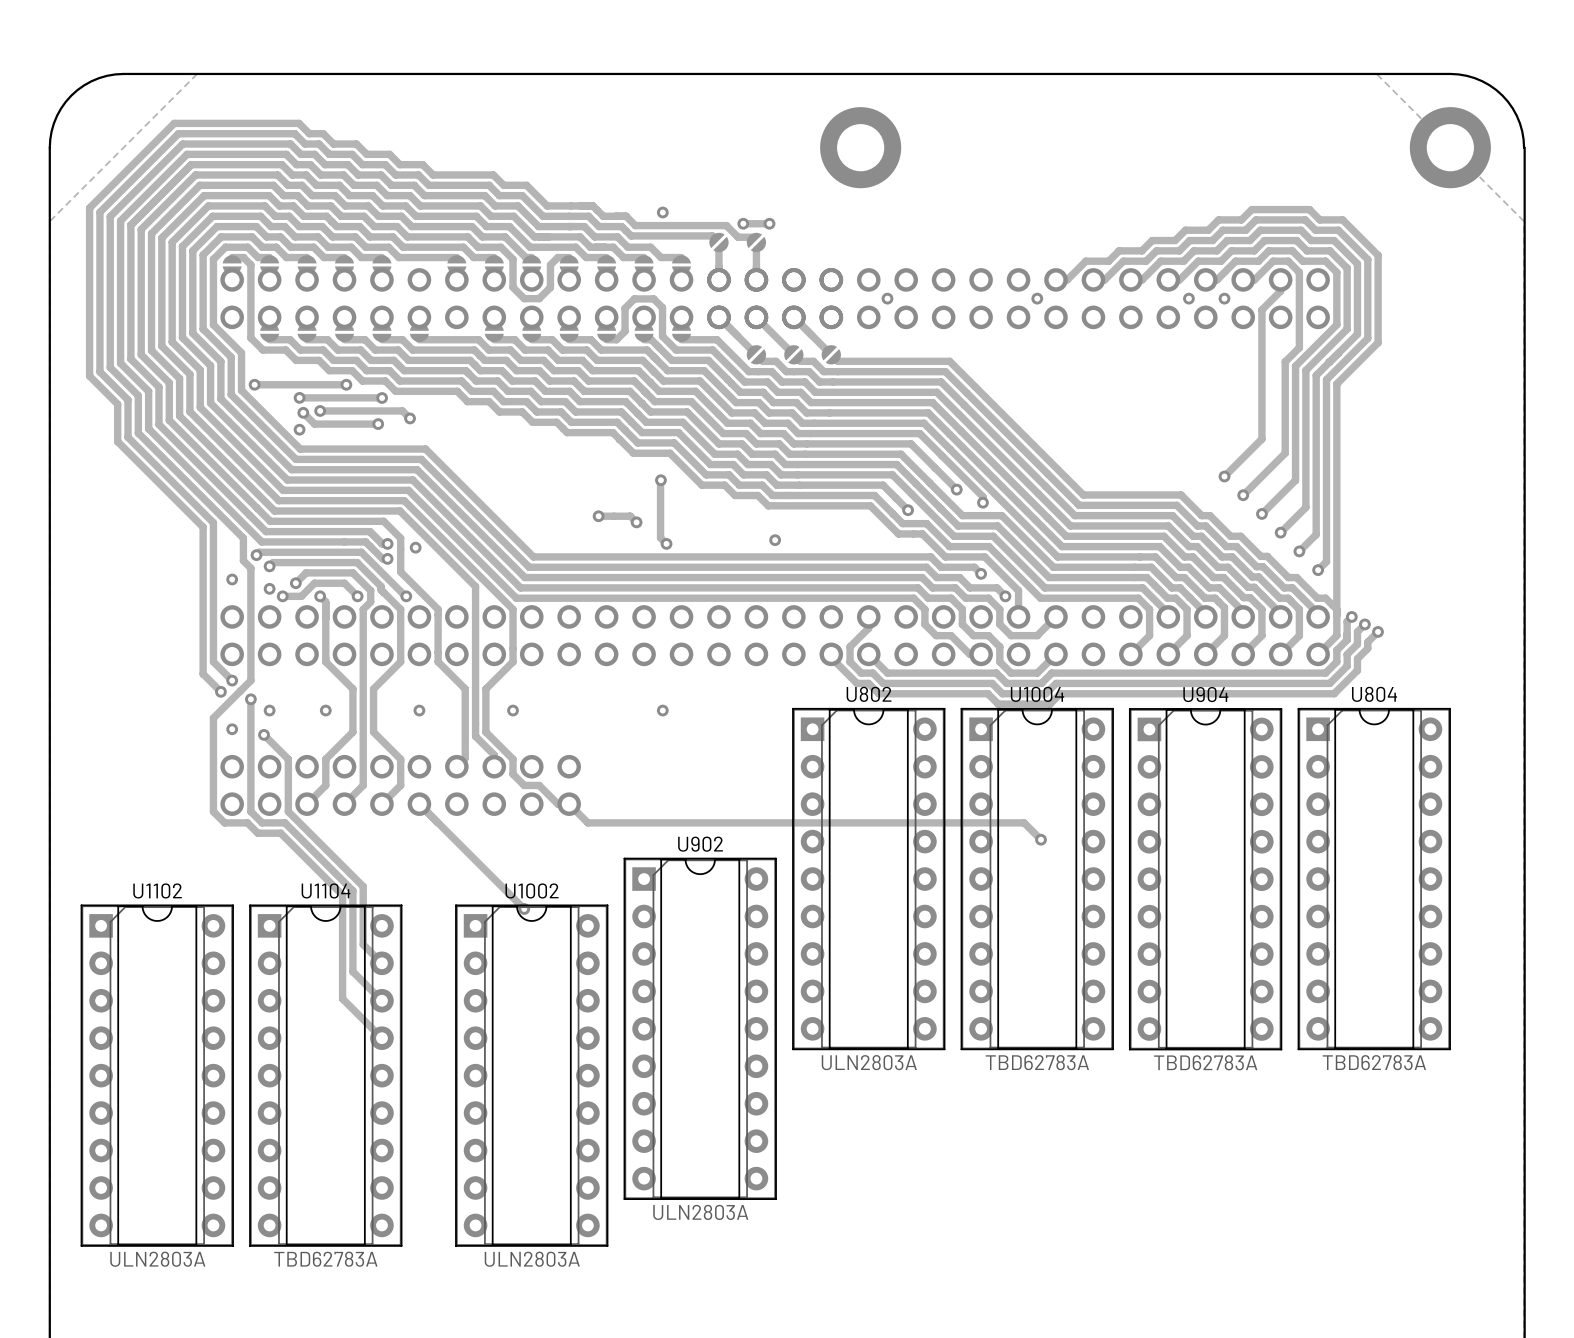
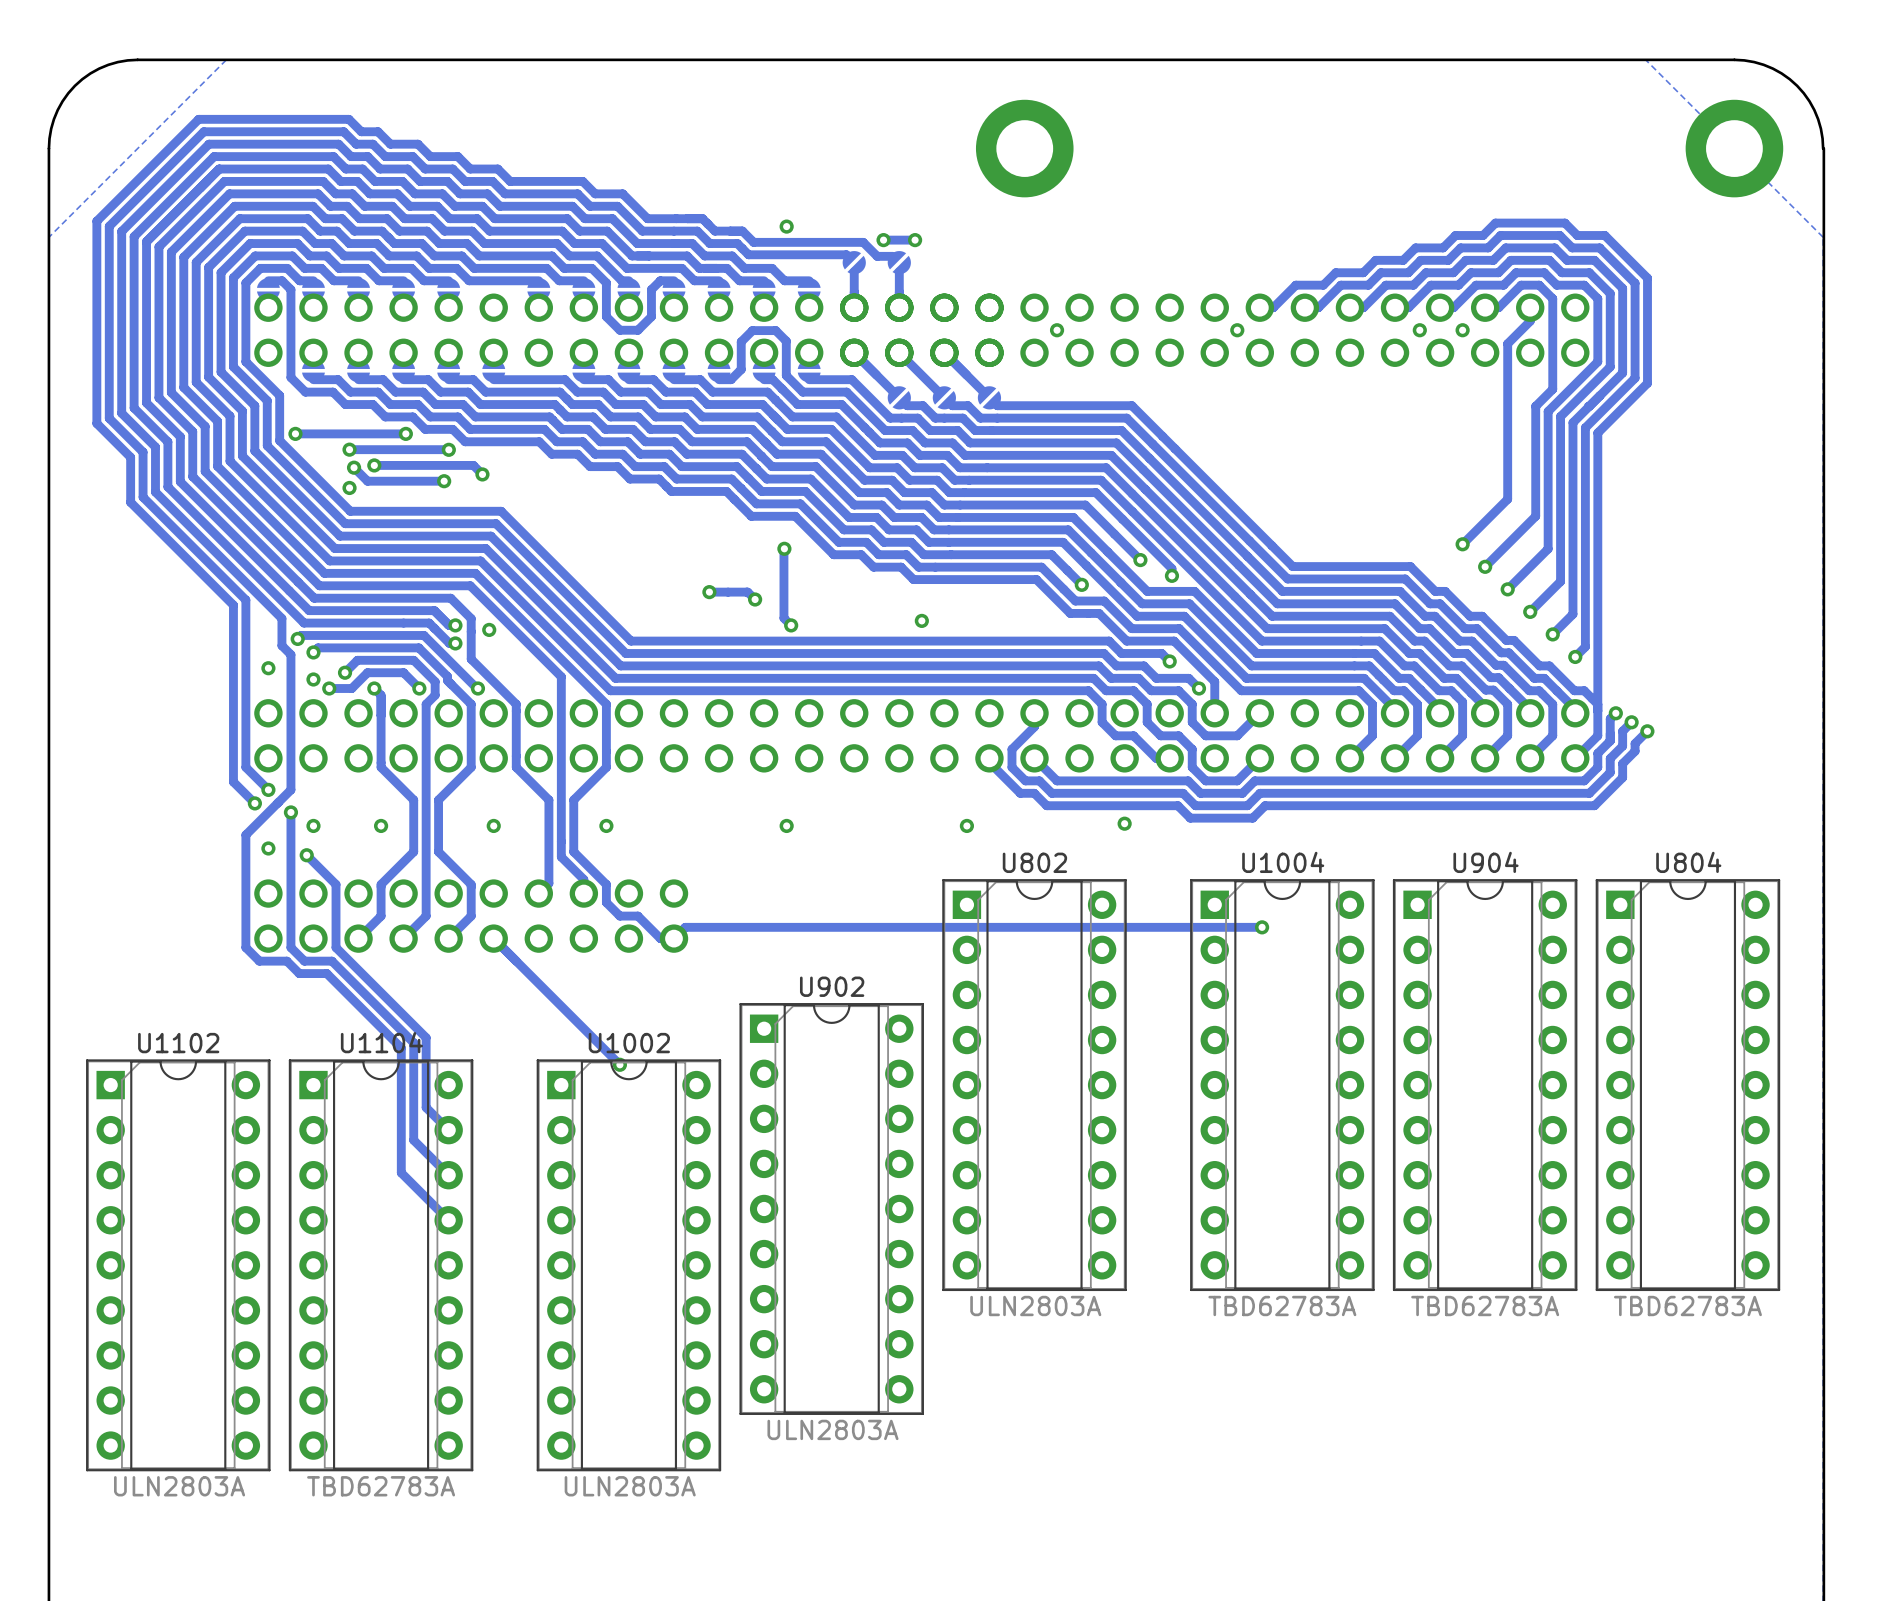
via: none -> (1124, 823)
via: none -> (966, 825)
track: (569, 804) (587, 822) (1024, 822) (1041, 839) -> (673, 938) (685, 927) (1262, 927)
via position: (1041, 839) -> (1262, 927)
U802 position: (868, 879) -> (1034, 1085)
U1004 position: (1037, 879) -> (1282, 1085)
U904 position: (1205, 879) -> (1485, 1085)
U804 position: (1374, 879) -> (1687, 1085)

